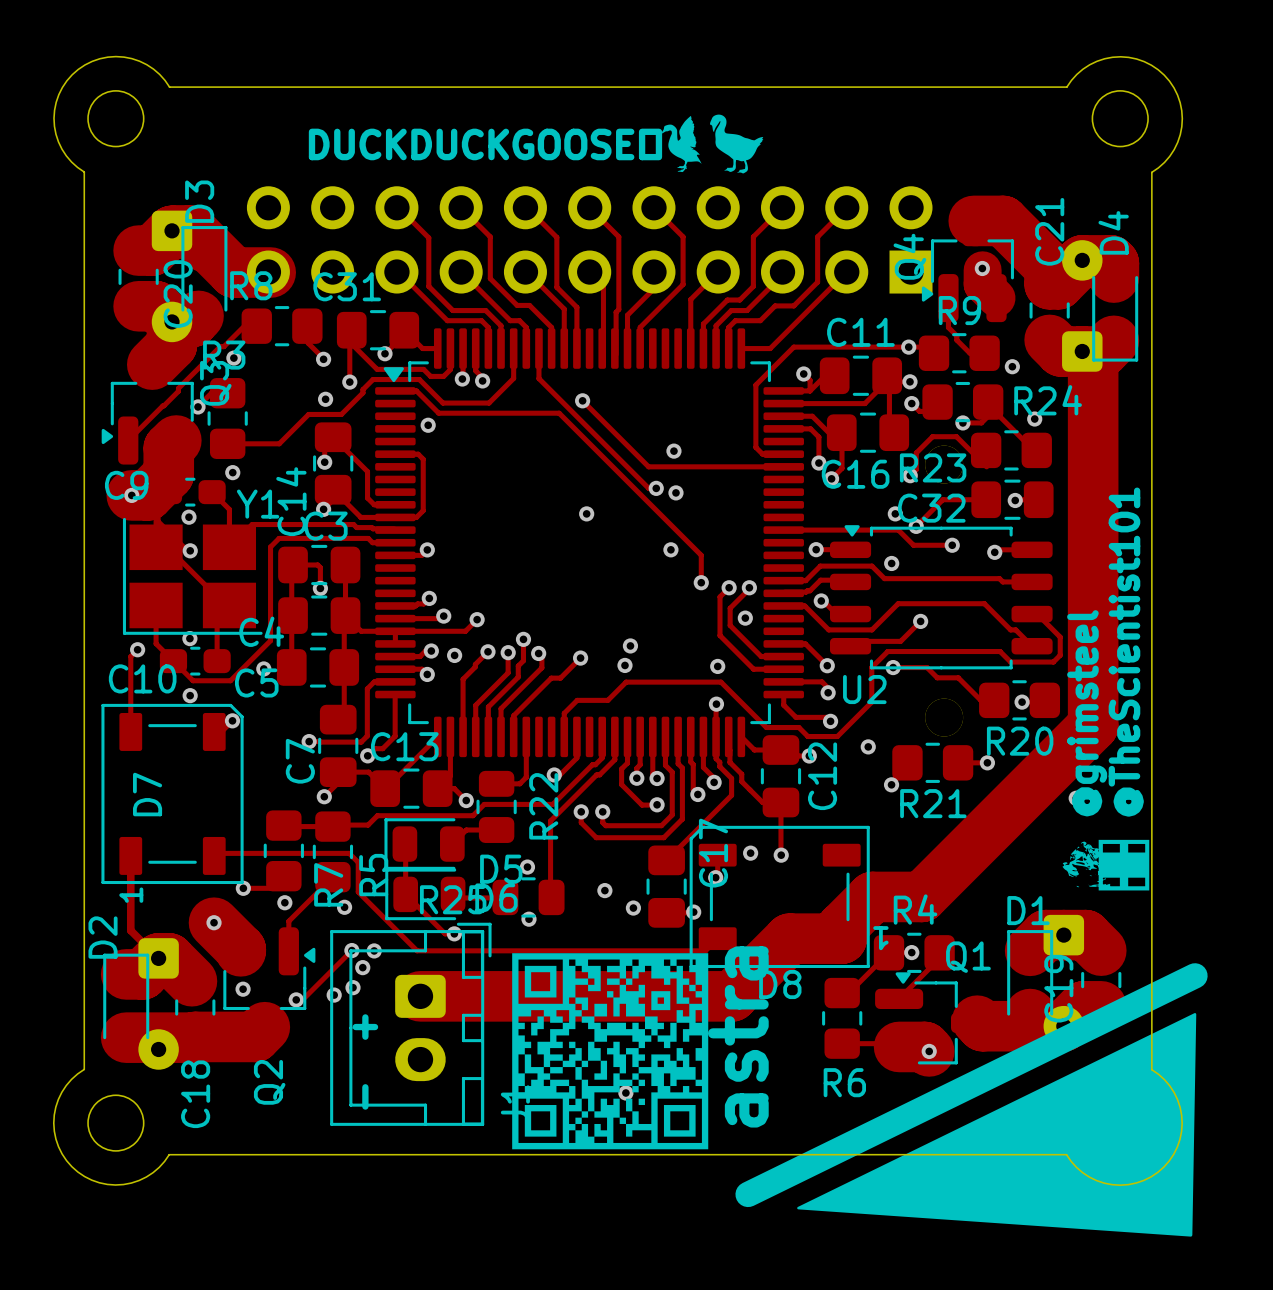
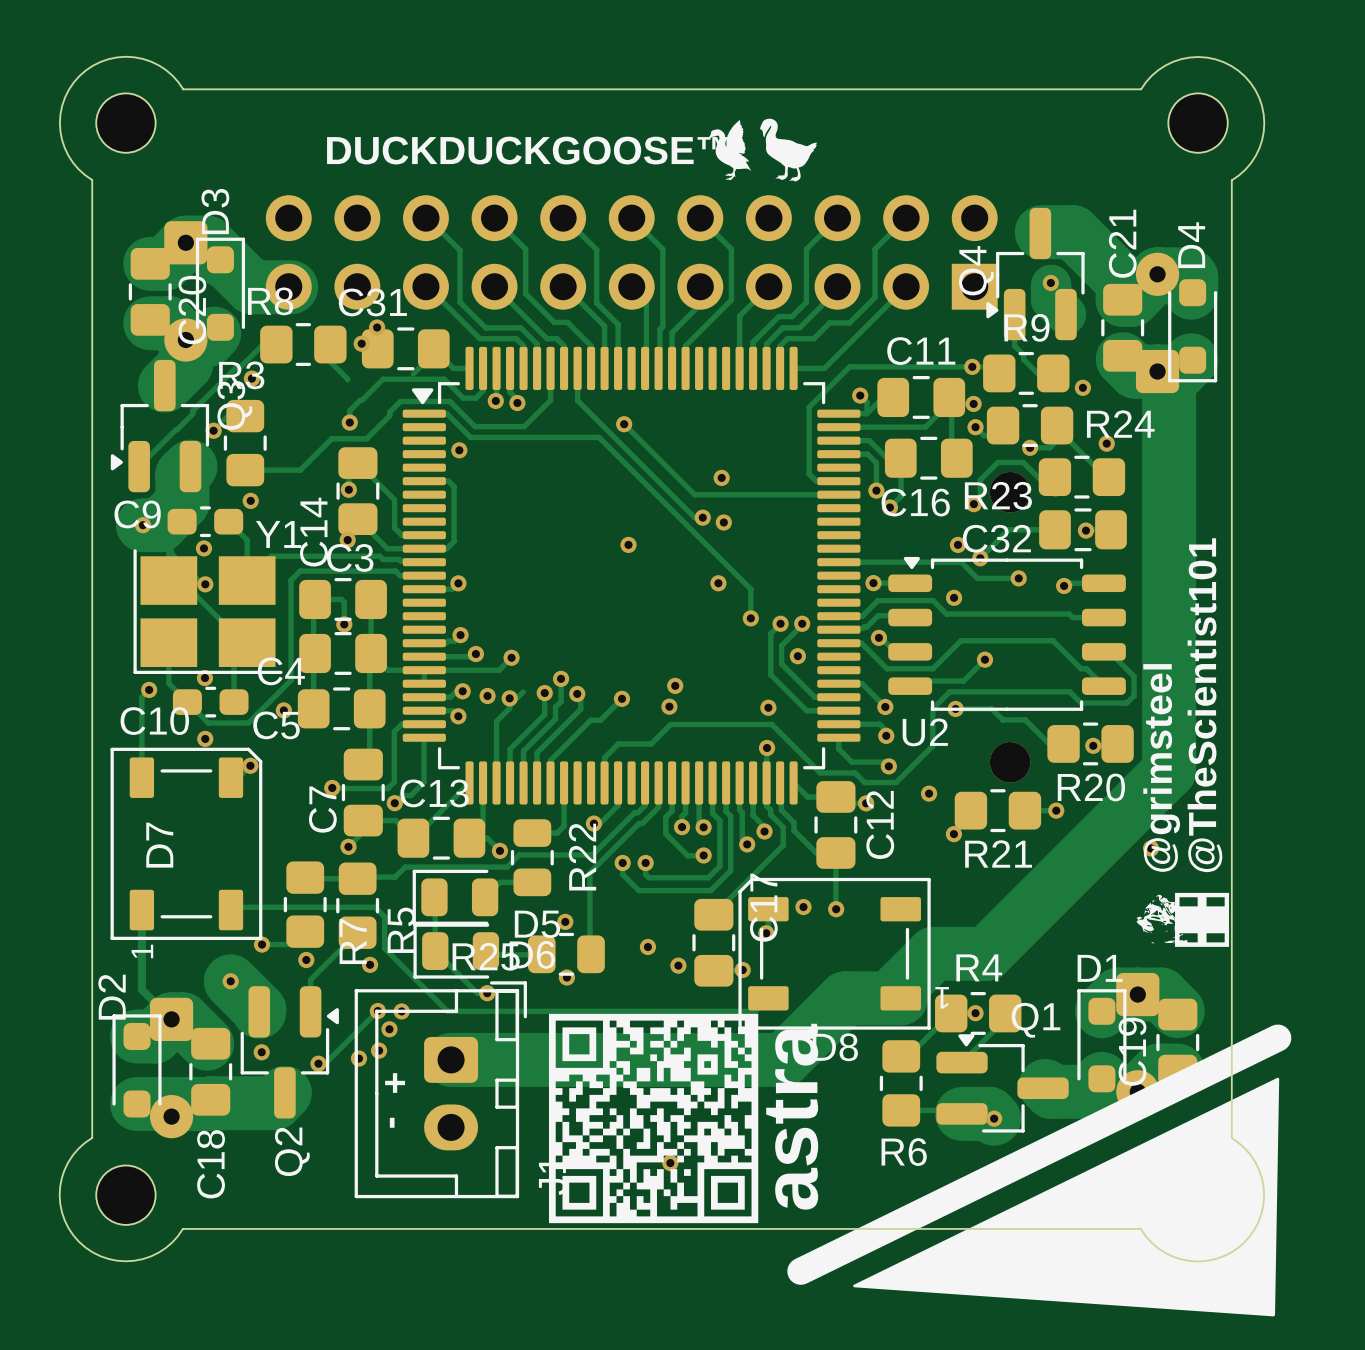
via: none -> (377, 327)
via: none -> (361, 343)
via: (384, 353) -> none
via: (323, 359) -> none
track: (431, 376) (423, 369) (377, 369) (351, 344) (351, 330) (349, 332) (349, 382) -> (463, 398) (444, 379) (383, 379) (362, 400)
track: none -> (360, 400) (349, 410) (349, 422)
via: (349, 382) -> none
via position: (487, 651) -> (509, 698)

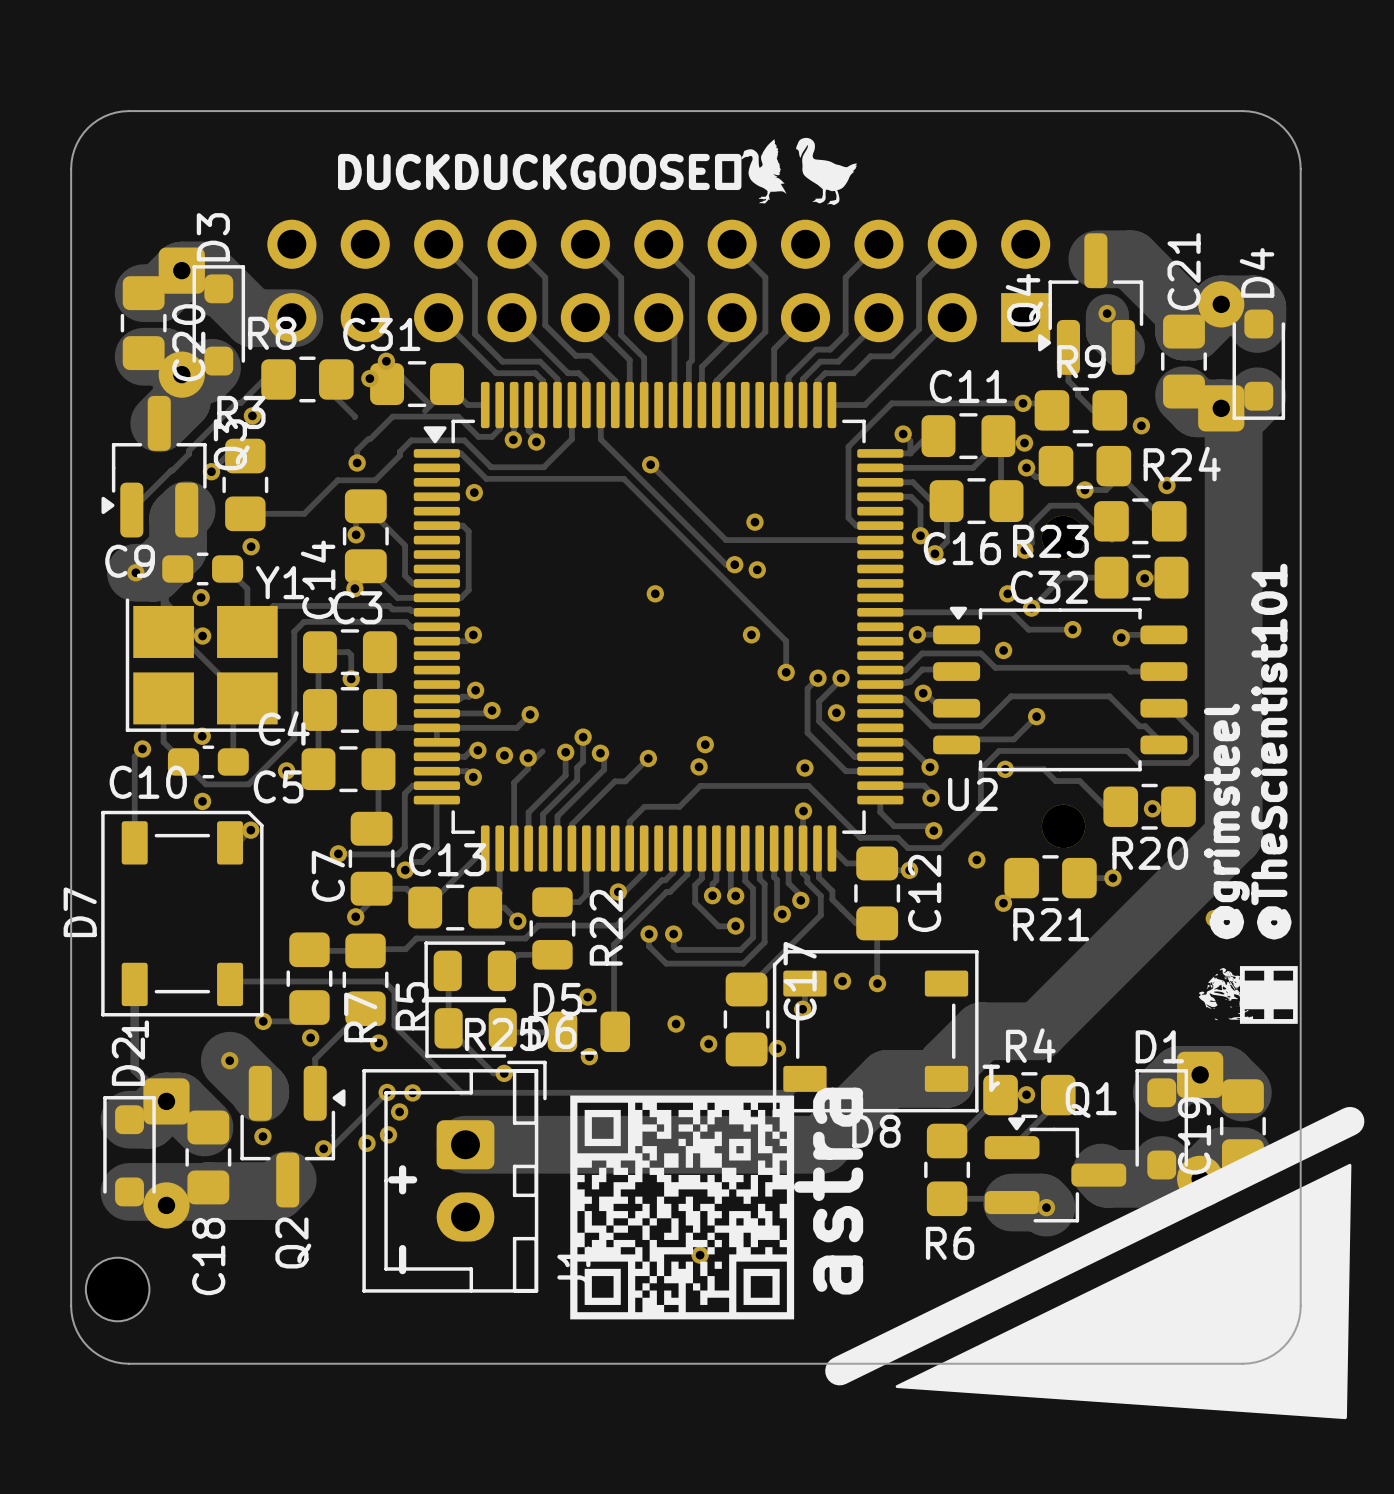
part: (125, 123) -> none
part: (1198, 123) -> none
board edge: (1231, 180) (1245, 169) (1255, 156) (1262, 140) (1263, 114) (1255, 90) (1244, 76) (1231, 66) (1207, 57) (1189, 57) (1173, 61) (1158, 70) (1141, 89) (183, 89) (166, 70) (143, 58) (125, 56) (108, 59) (85, 70) (73, 82) (65, 97) (59, 122) (62, 139) (68, 155) (78, 169) (92, 180) (92, 1137) (78, 1148) (68, 1162) (61, 1178) (59, 1195) (64, 1220) (78, 1241) (100, 1256) (125, 1261) (142, 1259) (158, 1252) (172, 1242) (182, 1228) (1140, 1228) (1151, 1242) (1165, 1252) (1181, 1259) (1198, 1261) (1215, 1259) (1238, 1247) (1250, 1235) (1261, 1212) (1264, 1195) (1259, 1170) (1250, 1155) (1231, 1138) -> (1300, 203) (1300, 162) (1291, 138) (1273, 119) (1249, 111) (128, 111) (103, 116) (88, 128) (76, 143) (71, 168) (71, 1312) (76, 1331) (88, 1346) (103, 1358) (128, 1363) (1249, 1363) (1262, 1360) (1278, 1351) (1288, 1341) (1297, 1325) (1300, 1305) (1300, 1228)
track: none -> (386, 361) (430, 405)
D7 name position: D7 (159, 845) -> D7 (80, 912)
D2 name position: D2 (112, 997) -> D2 (128, 1061)

